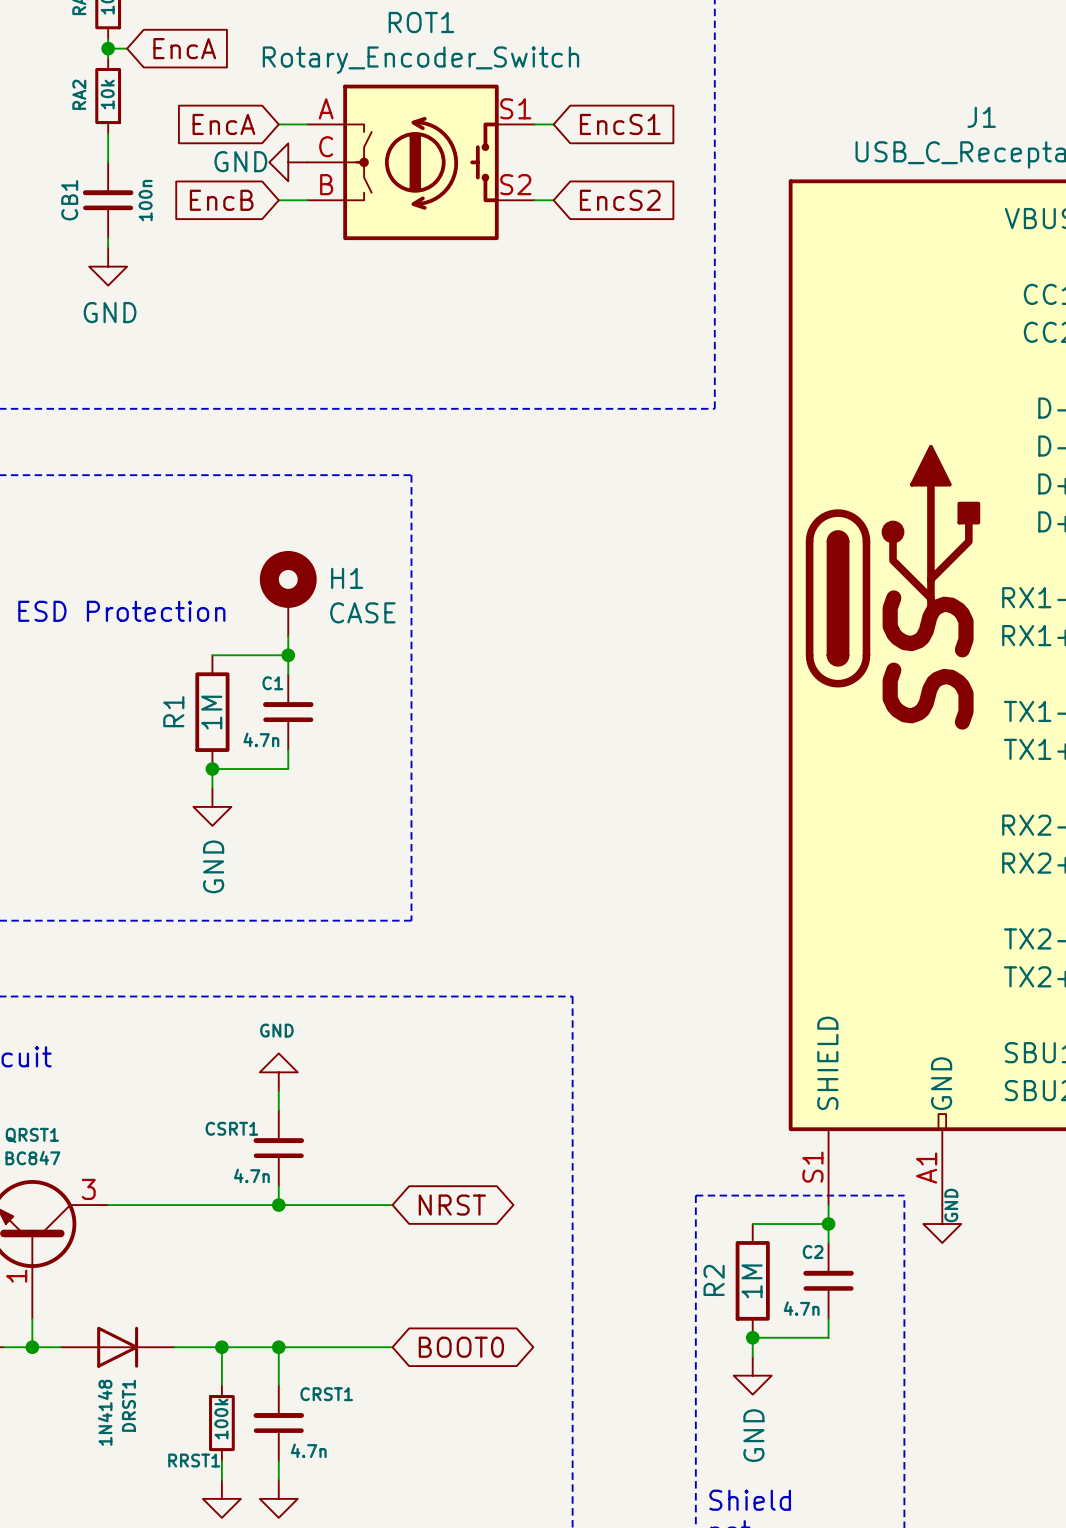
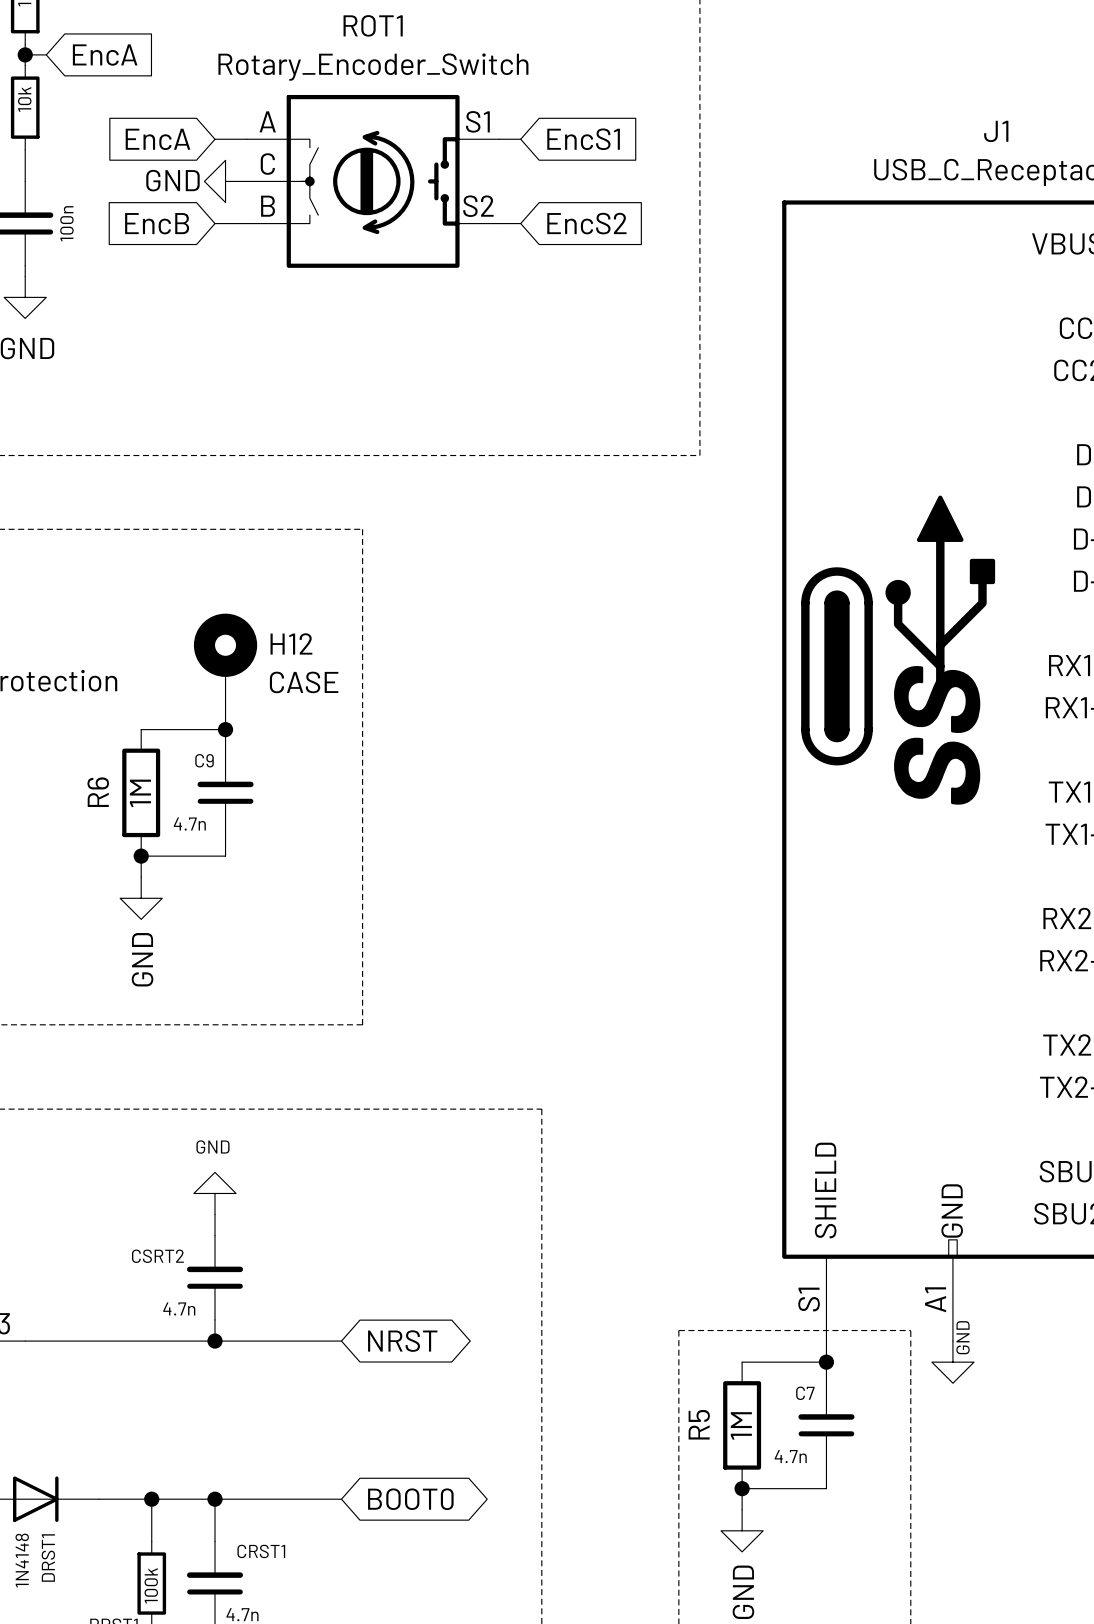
H1 name: H1 (347, 578) -> H12 (291, 643)
C1 name: C1 (272, 683) -> C9 (204, 760)
R1 name: R1 (173, 711) -> R6 (98, 792)
CSRT1 name: CSRT1 (231, 1128) -> CSRT2 (157, 1256)
C2 name: C2 (813, 1252) -> C7 (805, 1393)
R2 name: R2 (714, 1280) -> R5 (699, 1424)

